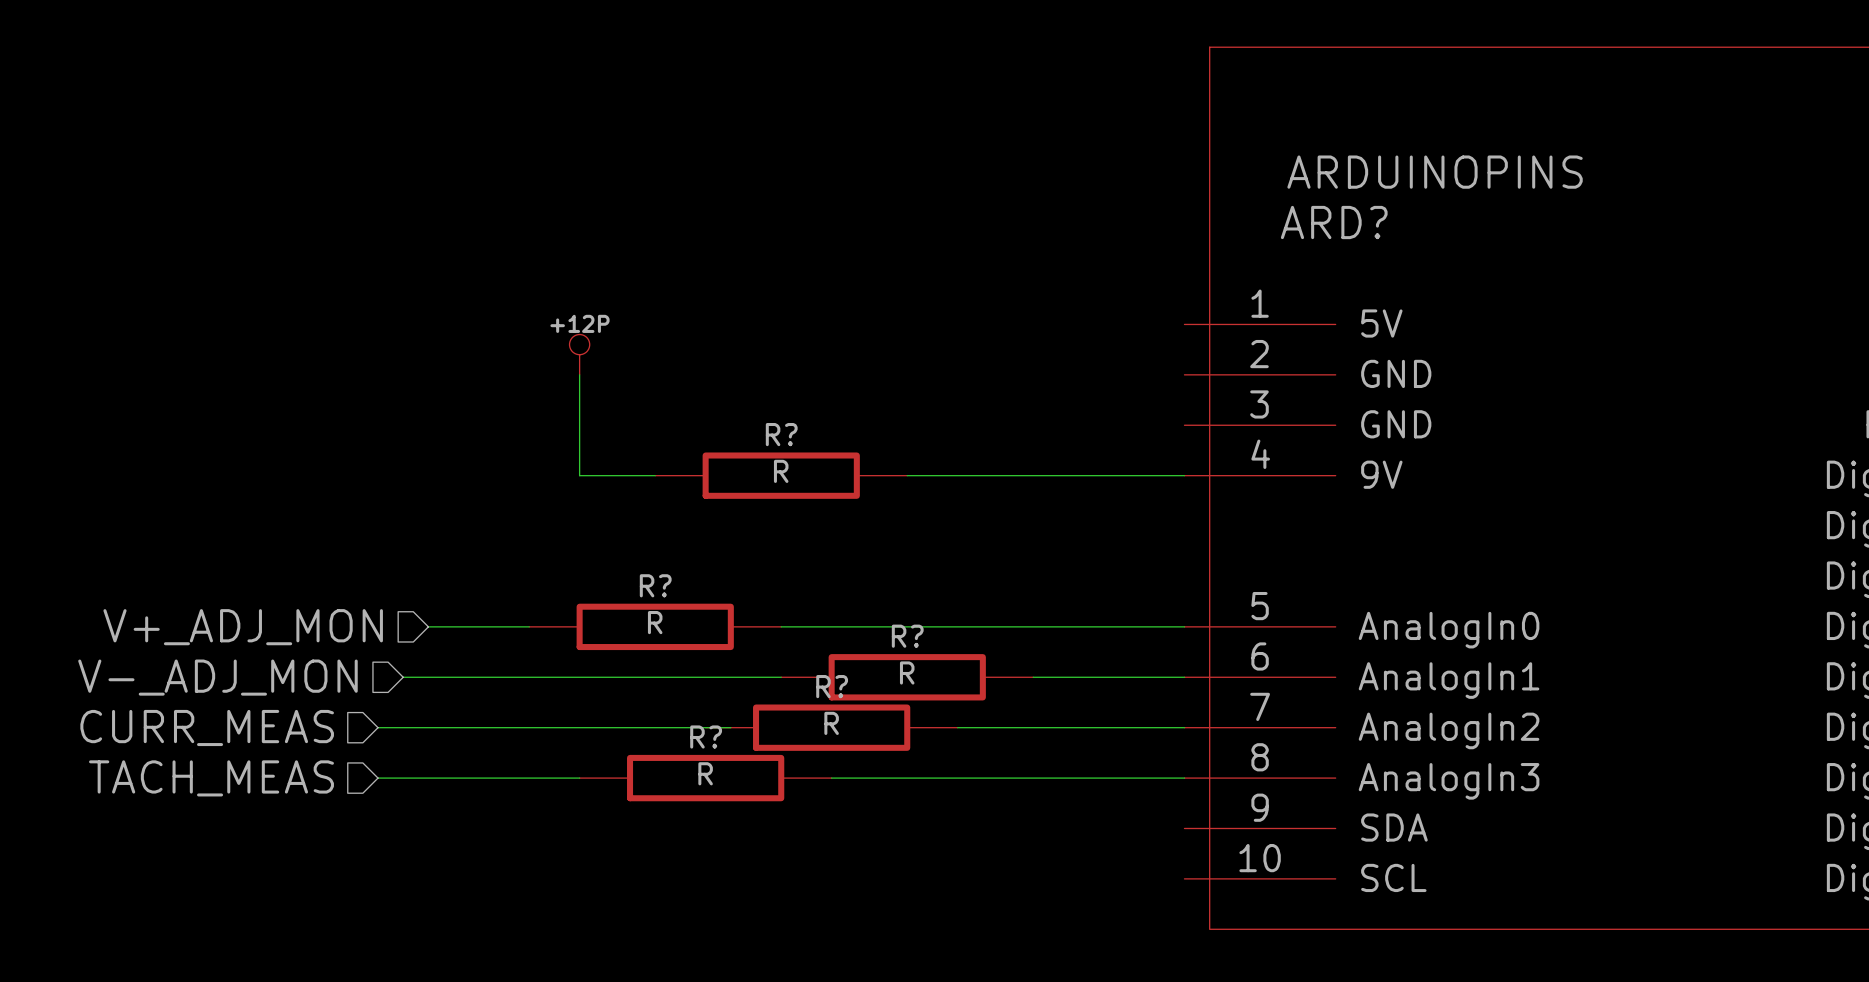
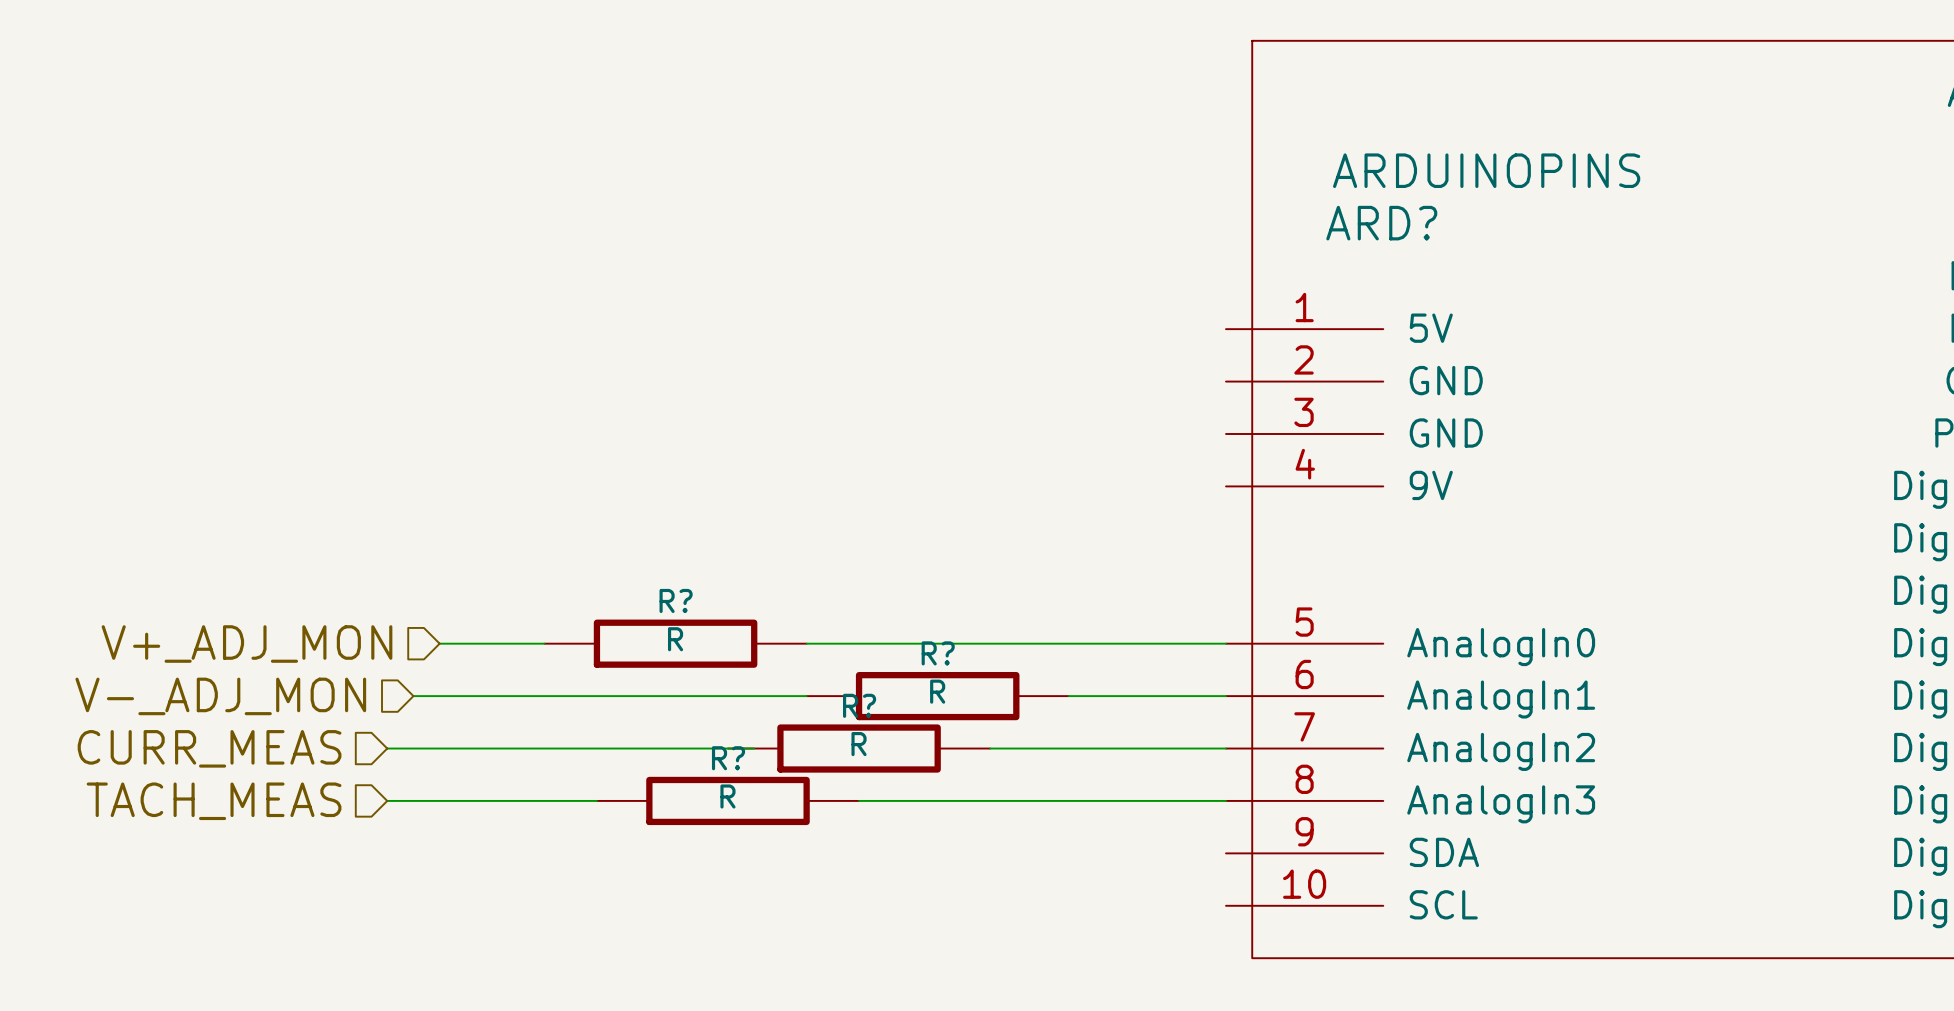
power symbol: +12P (579, 354) -> none
wire: (579, 374) (579, 475) (655, 475) -> none
R?: R (781, 475) -> none
wire: (907, 475) (1184, 475) -> none

